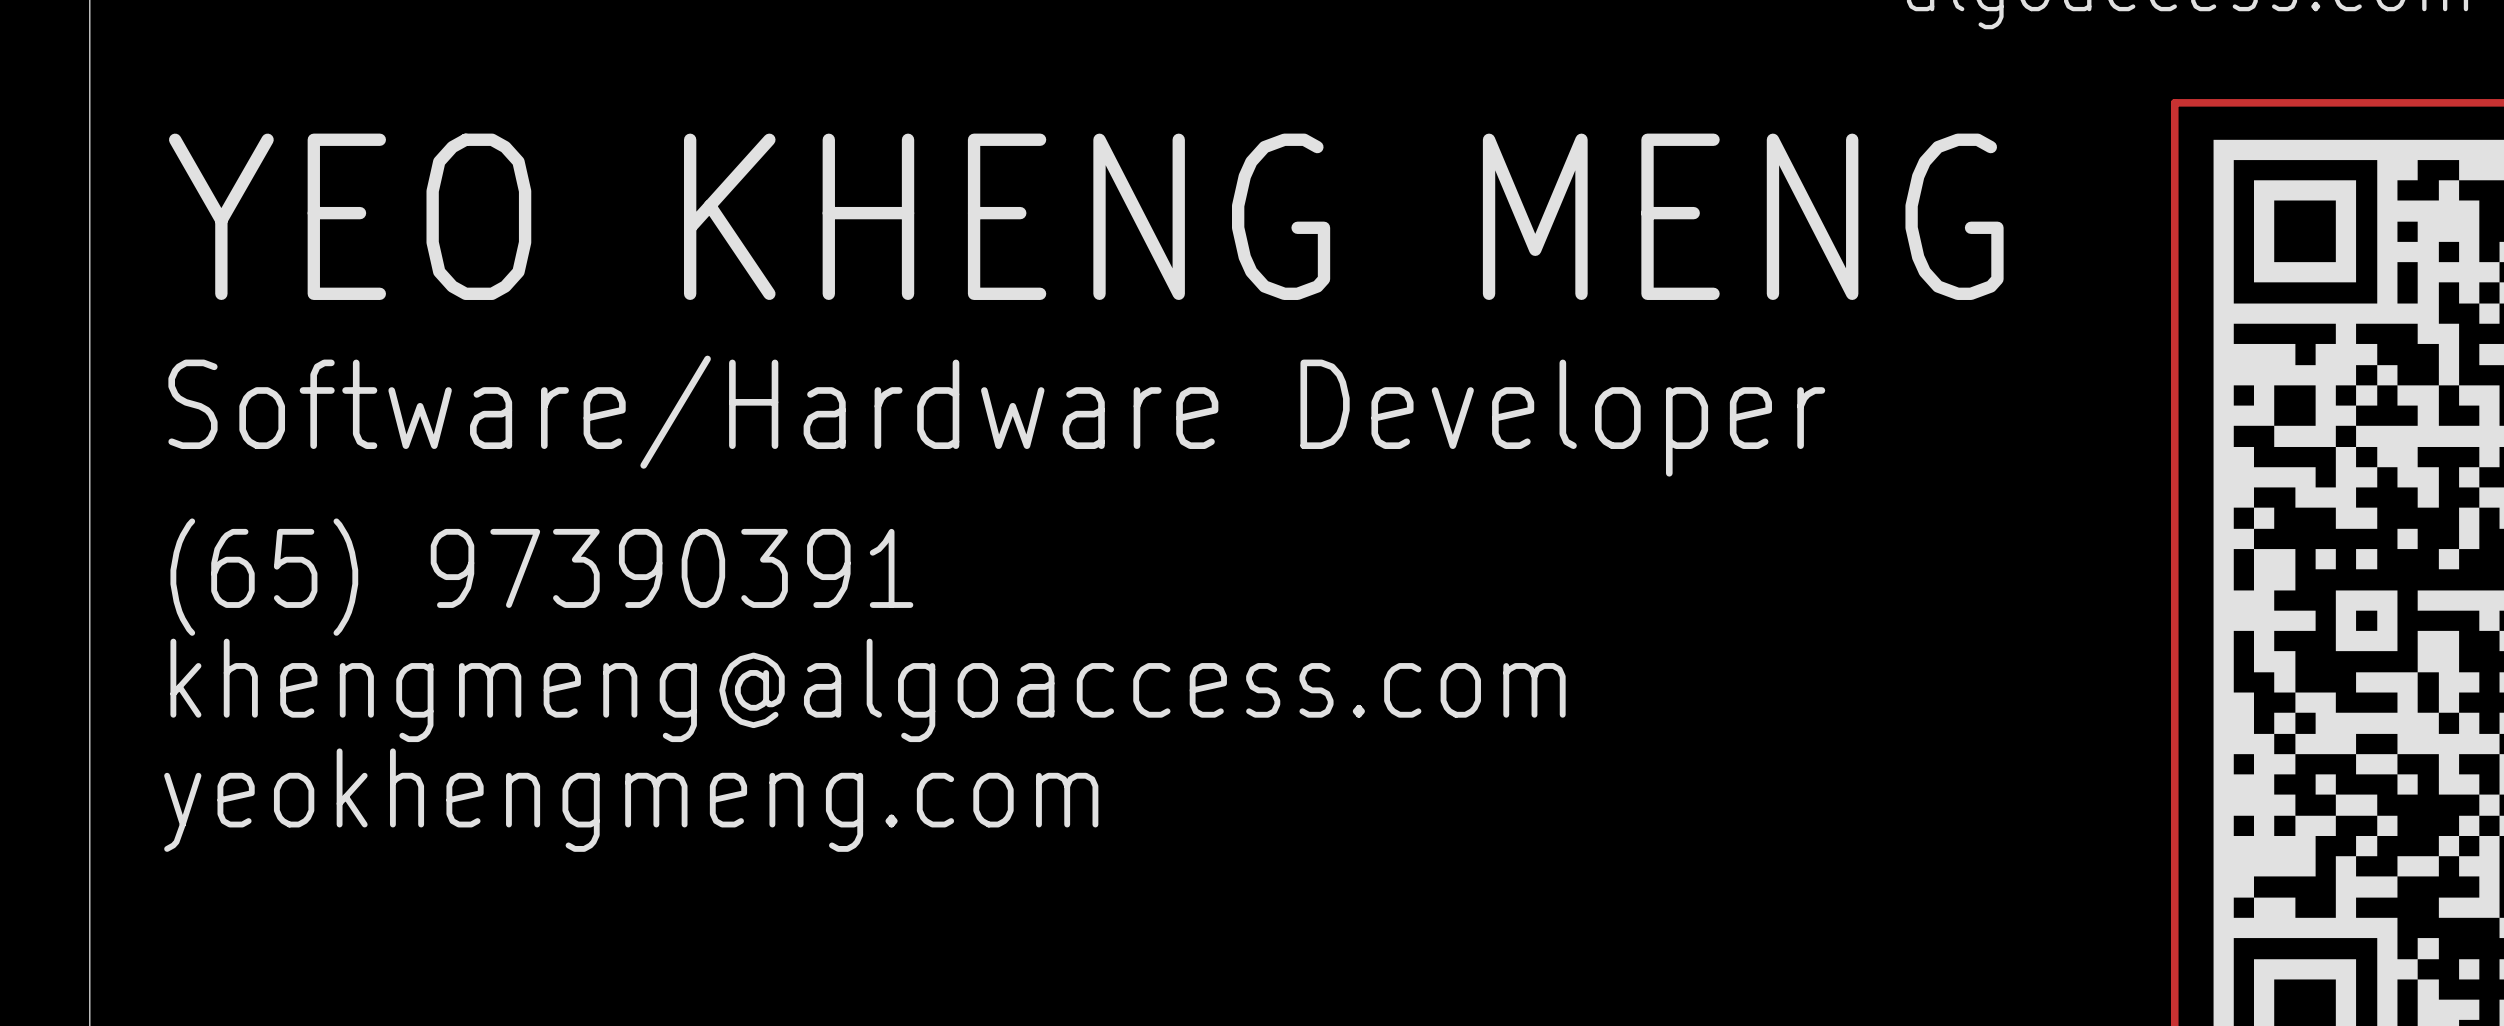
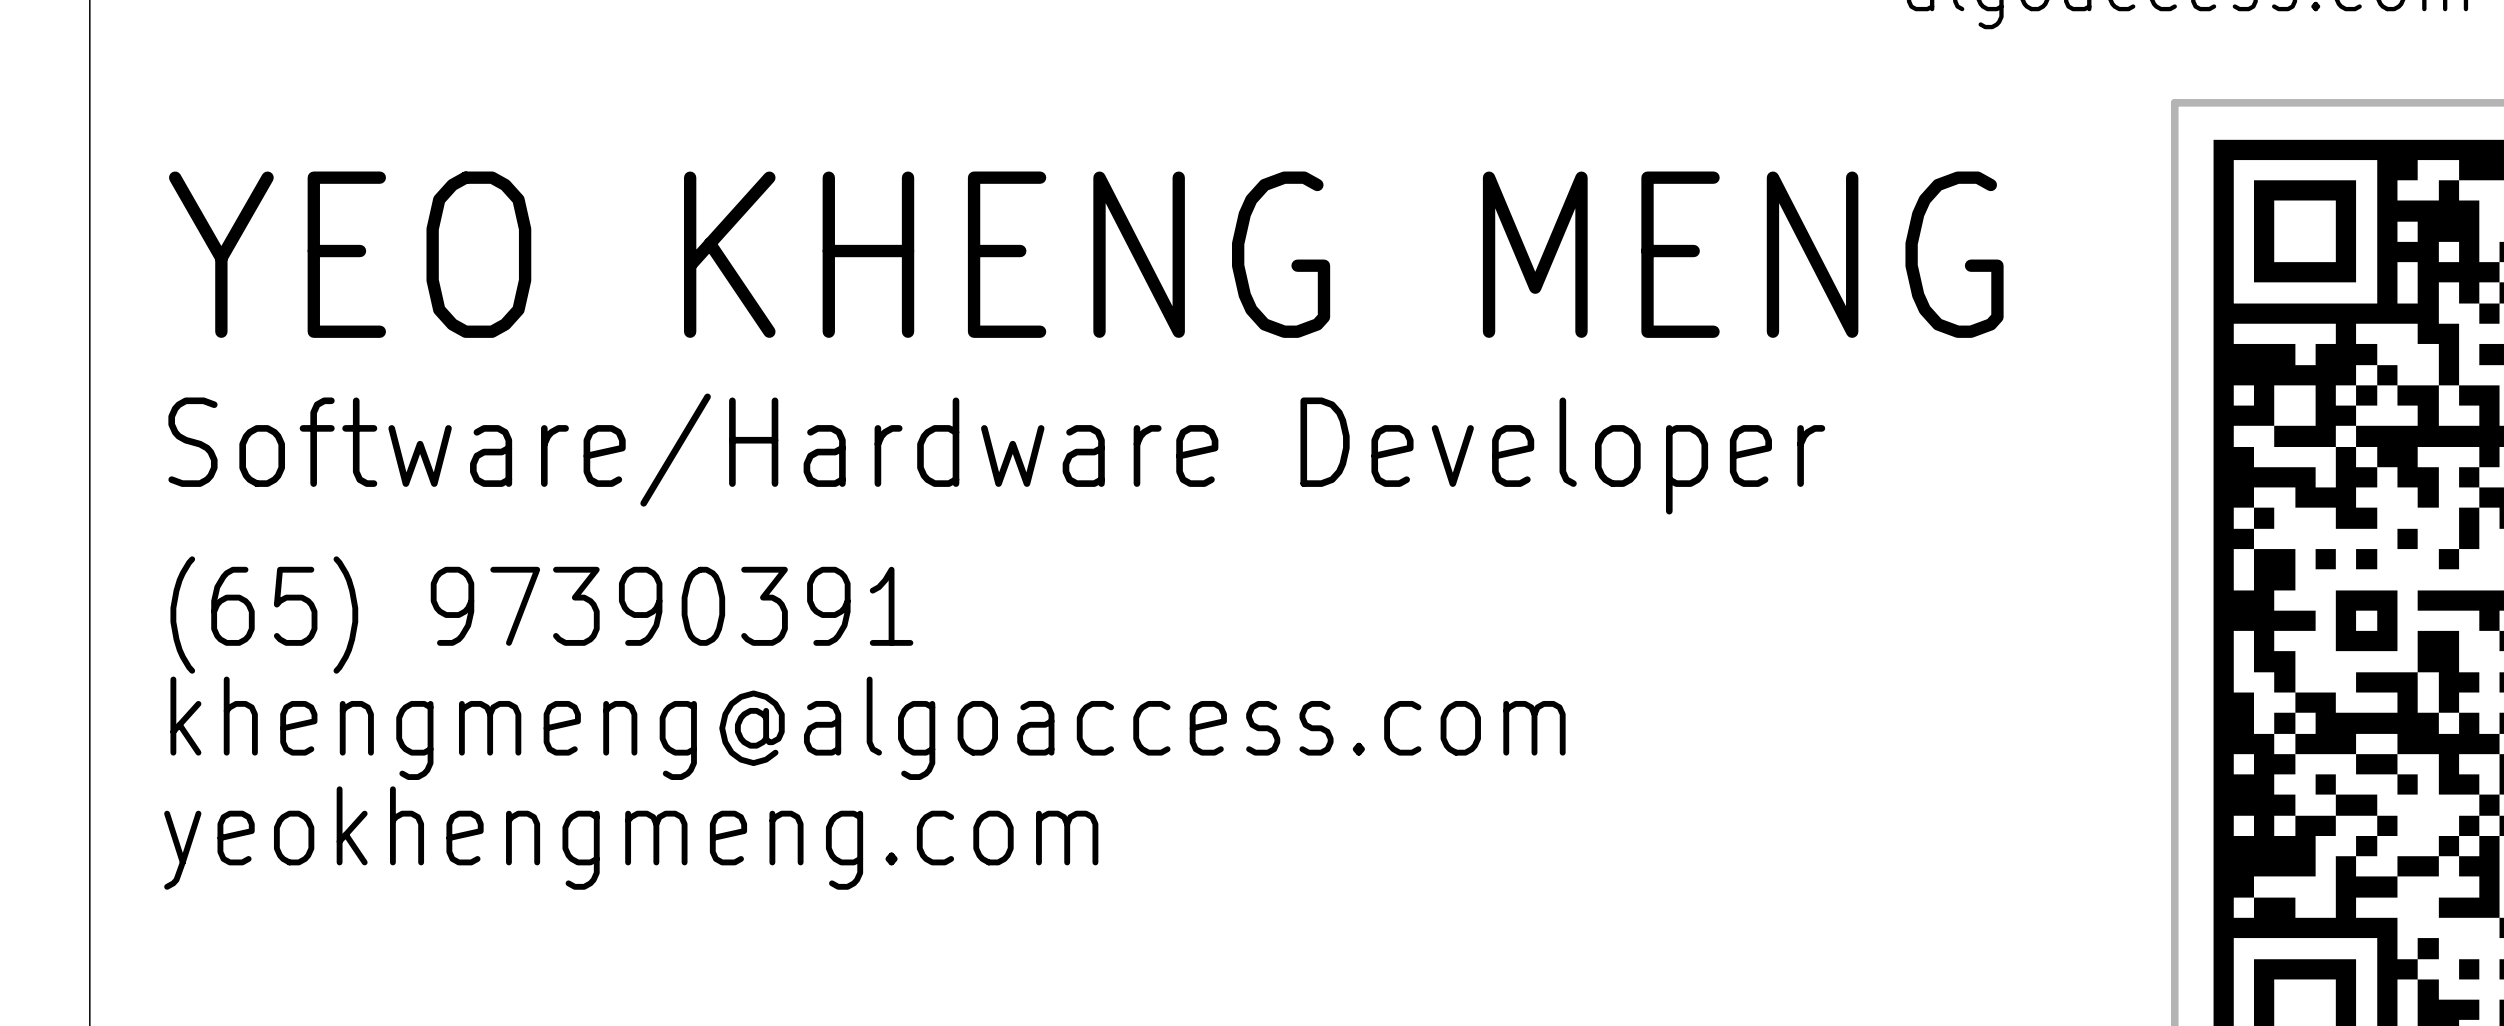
text position: YEO KHENG MENG (1086, 216) -> YEO KHENG MENG (1086, 254)
text position: Software/Hardware Developer (996, 416) -> Software/Hardware Developer (996, 454)
text position: (65) 97390391 (541, 577) -> (65) 97390391 (541, 615)
text position: khengmeng@algoaccess.com (868, 690) -> khengmeng@algoaccess.com (868, 728)
text position: yeokhengmeng.com (631, 800) -> yeokhengmeng.com (631, 838)

